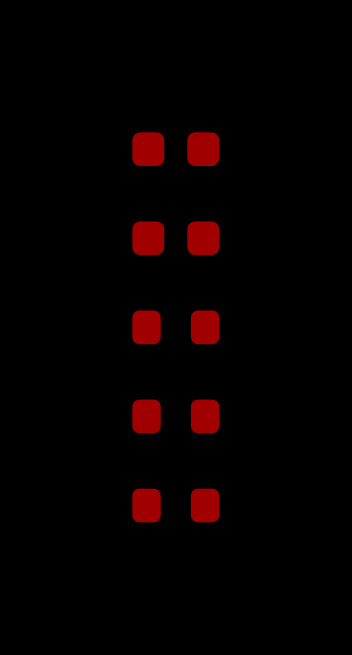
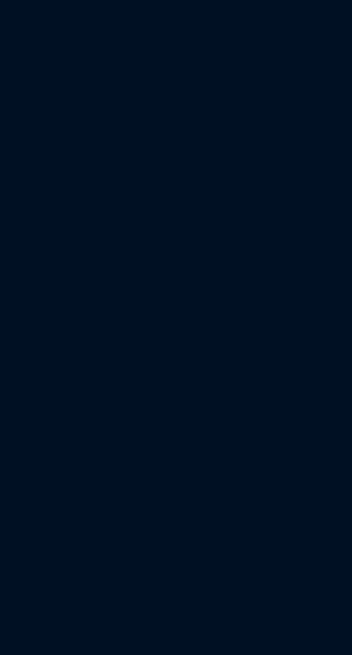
part: (175, 149) -> none
part: (175, 238) -> none
part: (175, 327) -> none
part: (175, 416) -> none
part: (175, 505) -> none

